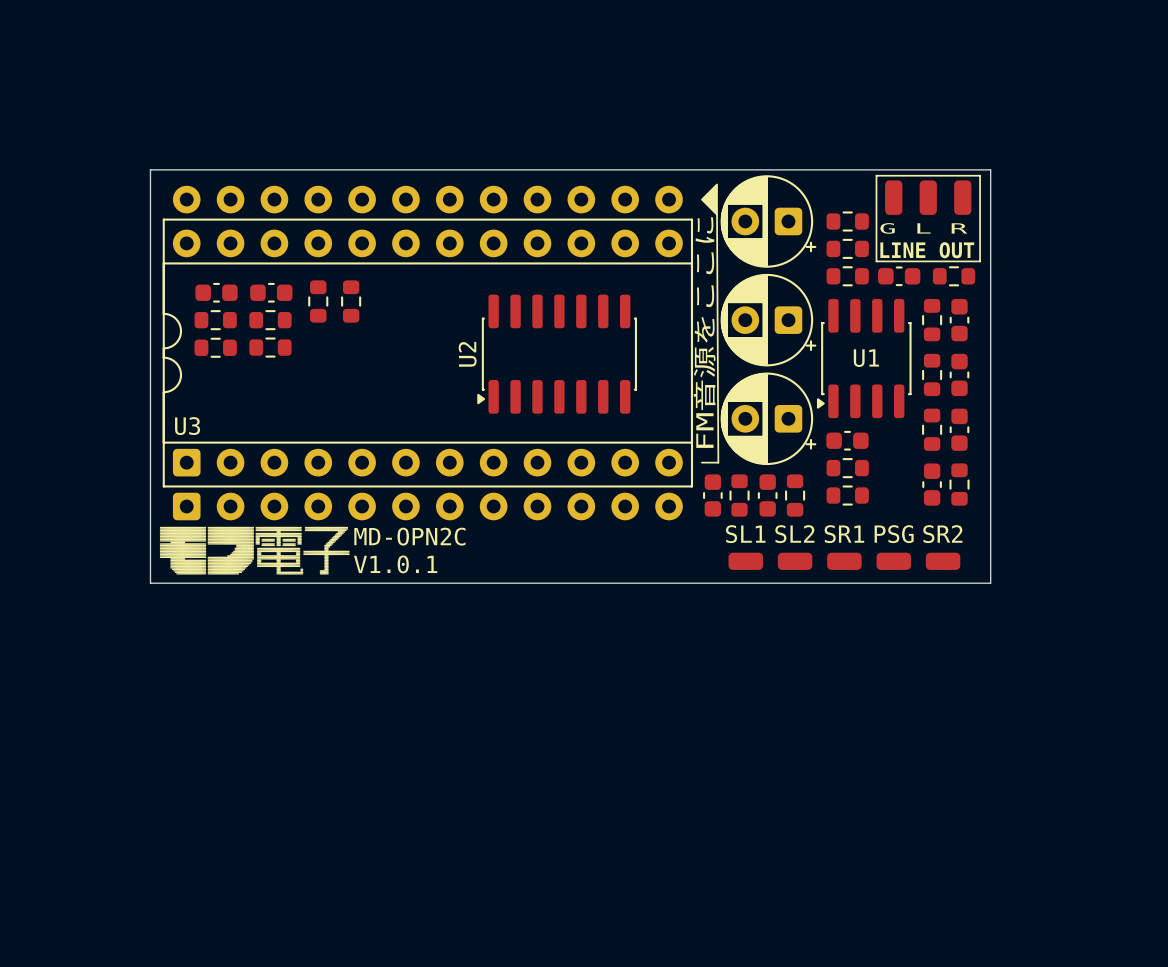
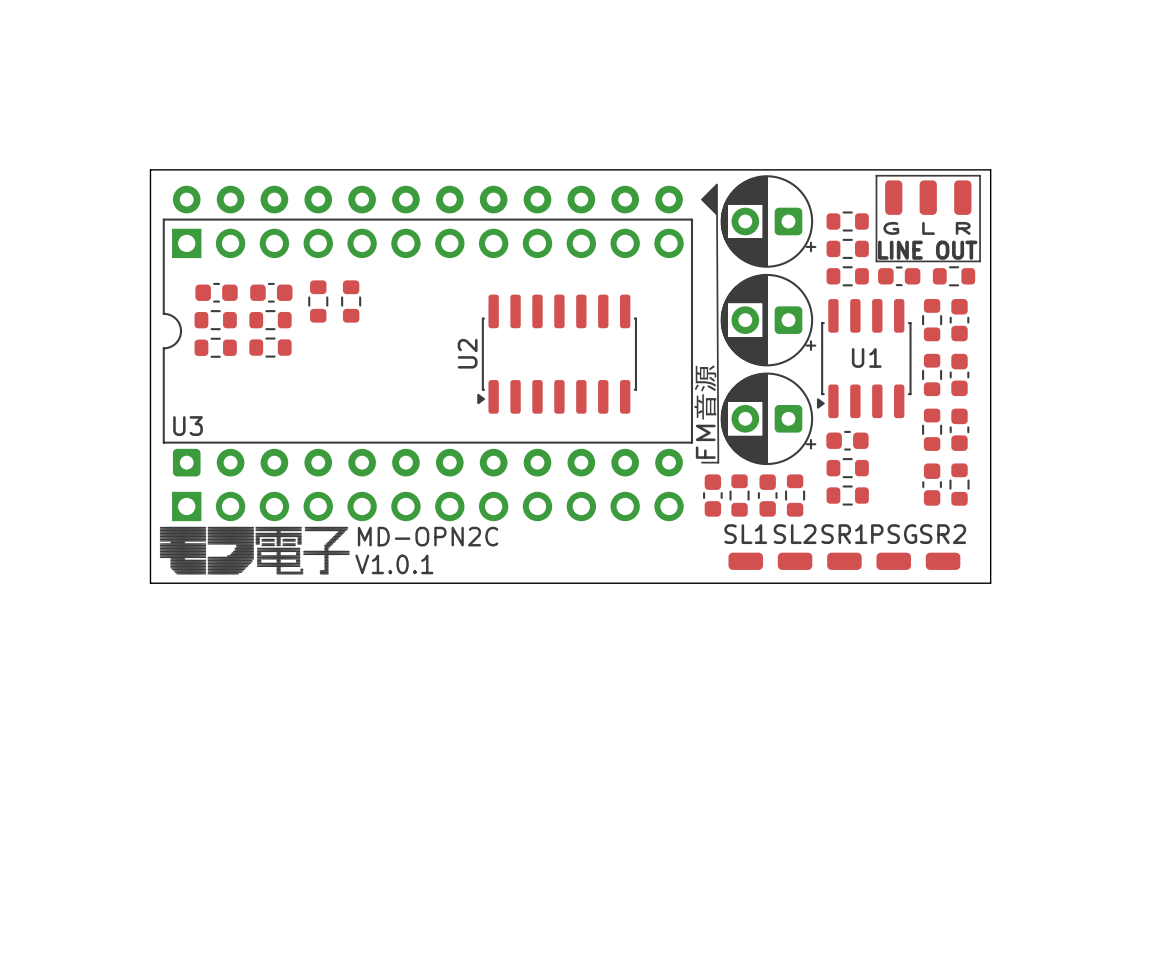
part: none -> (427, 243)
text: FM音源をここに (704, 332) -> FM音源 (705, 411)
part: (427, 374) -> none
part: none -> (427, 506)

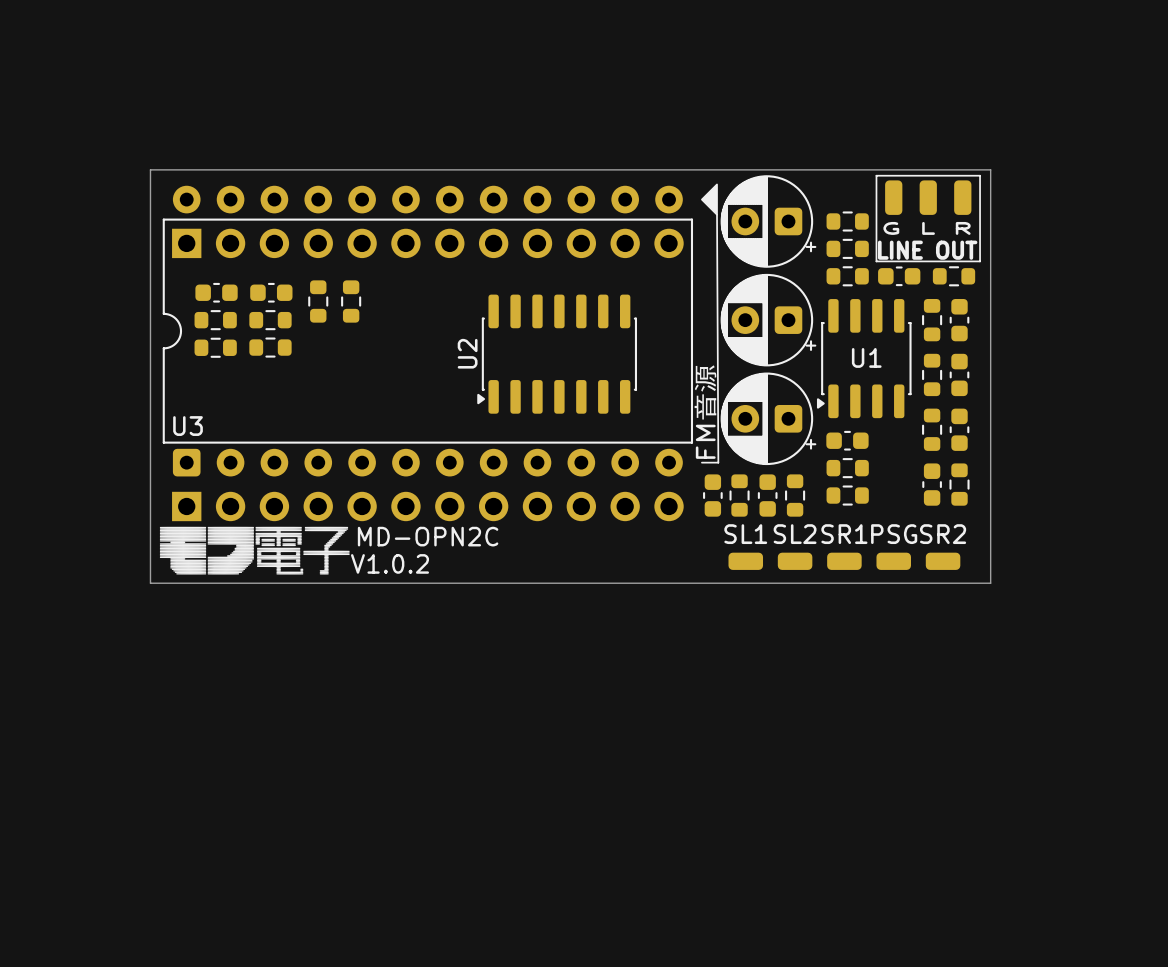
text: V1.0.1 (394, 564) -> V1.0.2 (390, 563)

